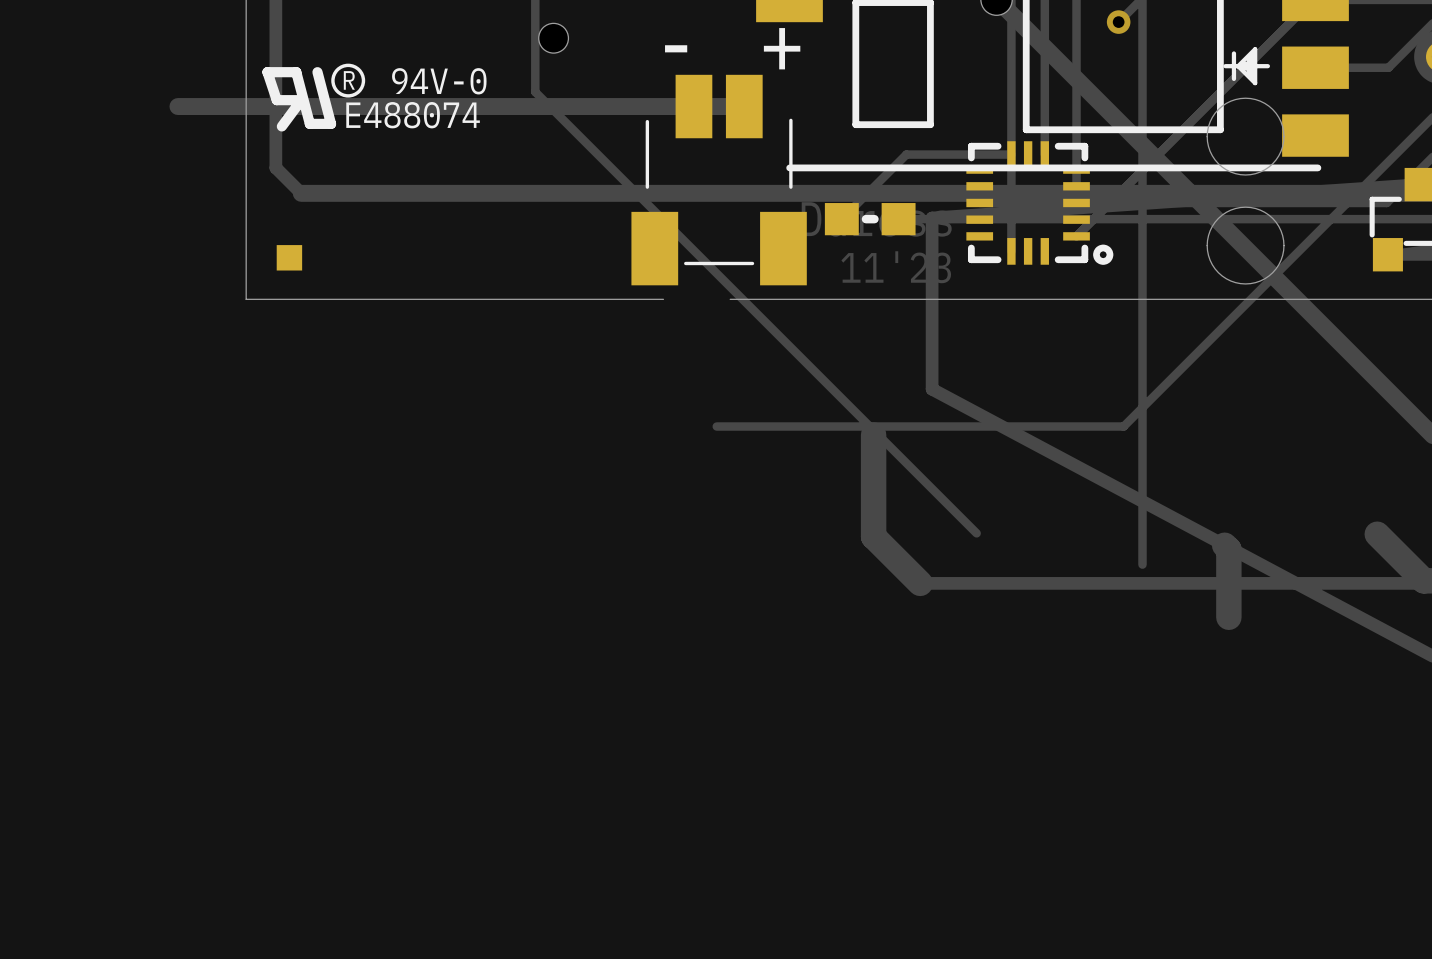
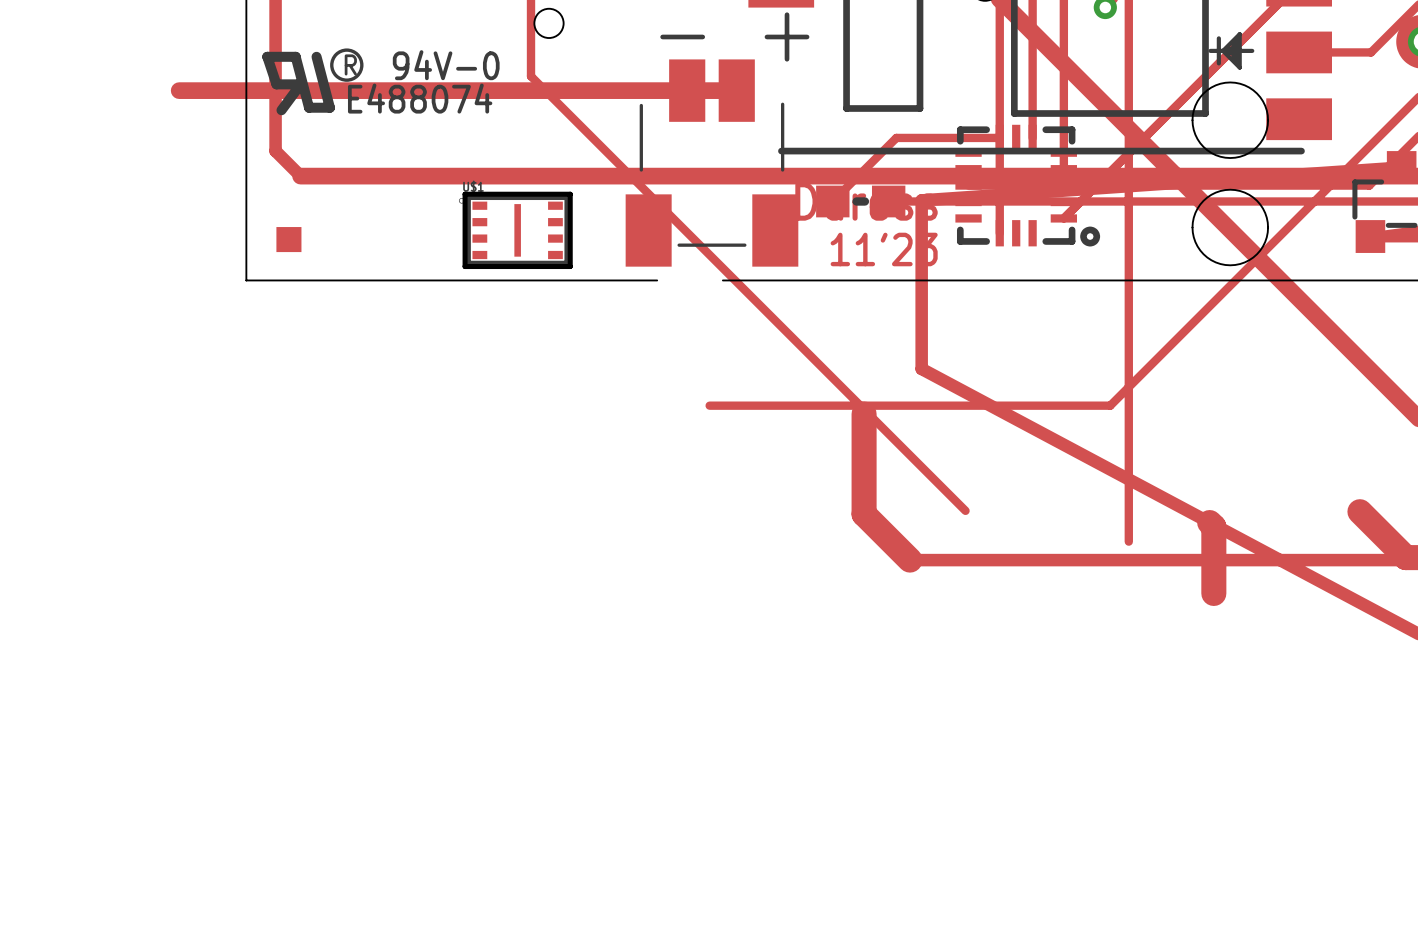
part: none -> (515, 230)

